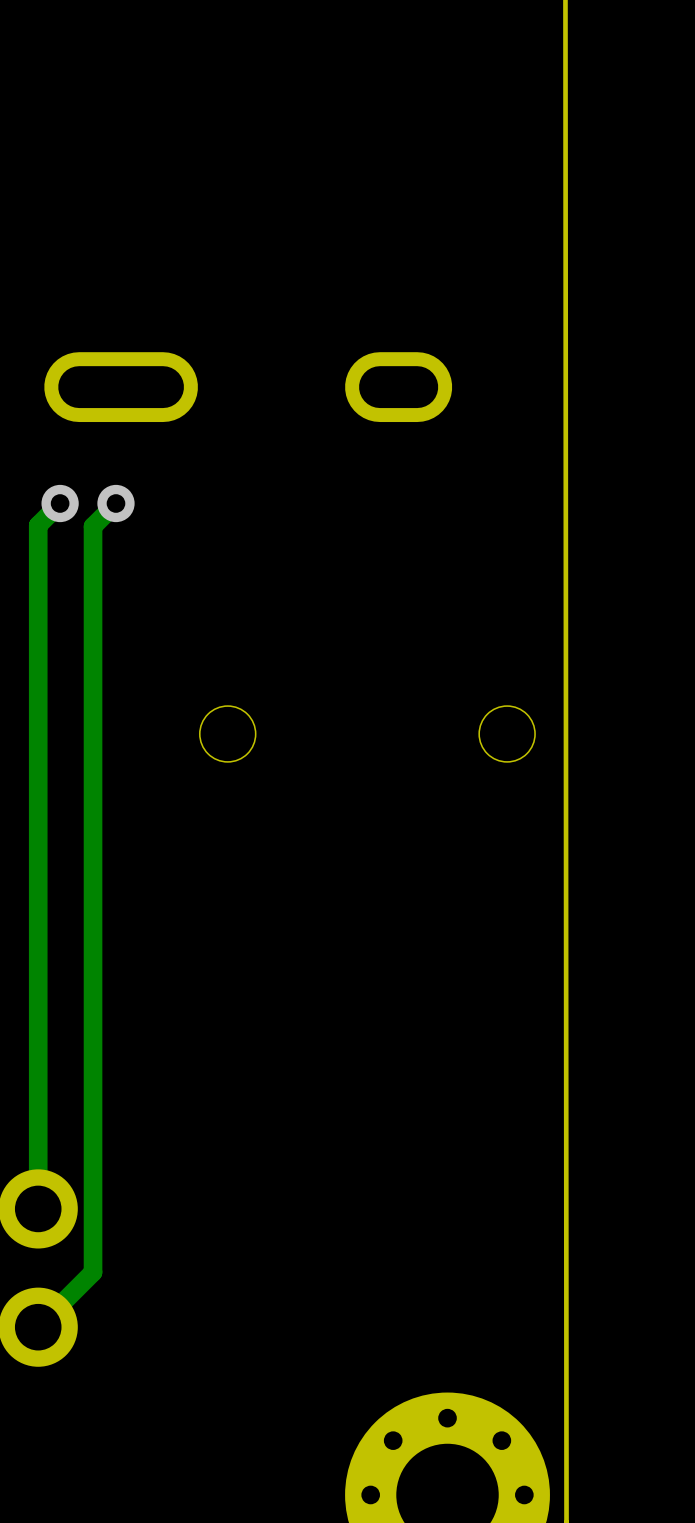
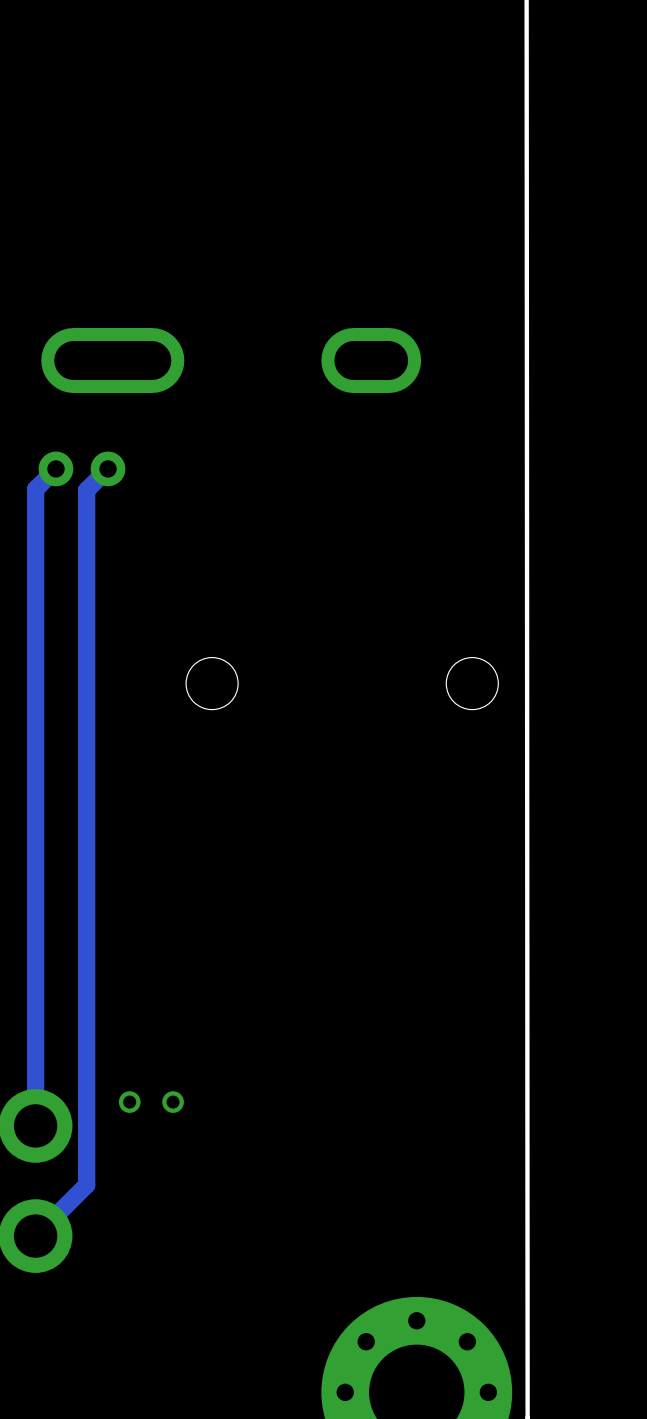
via: none -> (129, 1102)
via: none -> (173, 1102)

